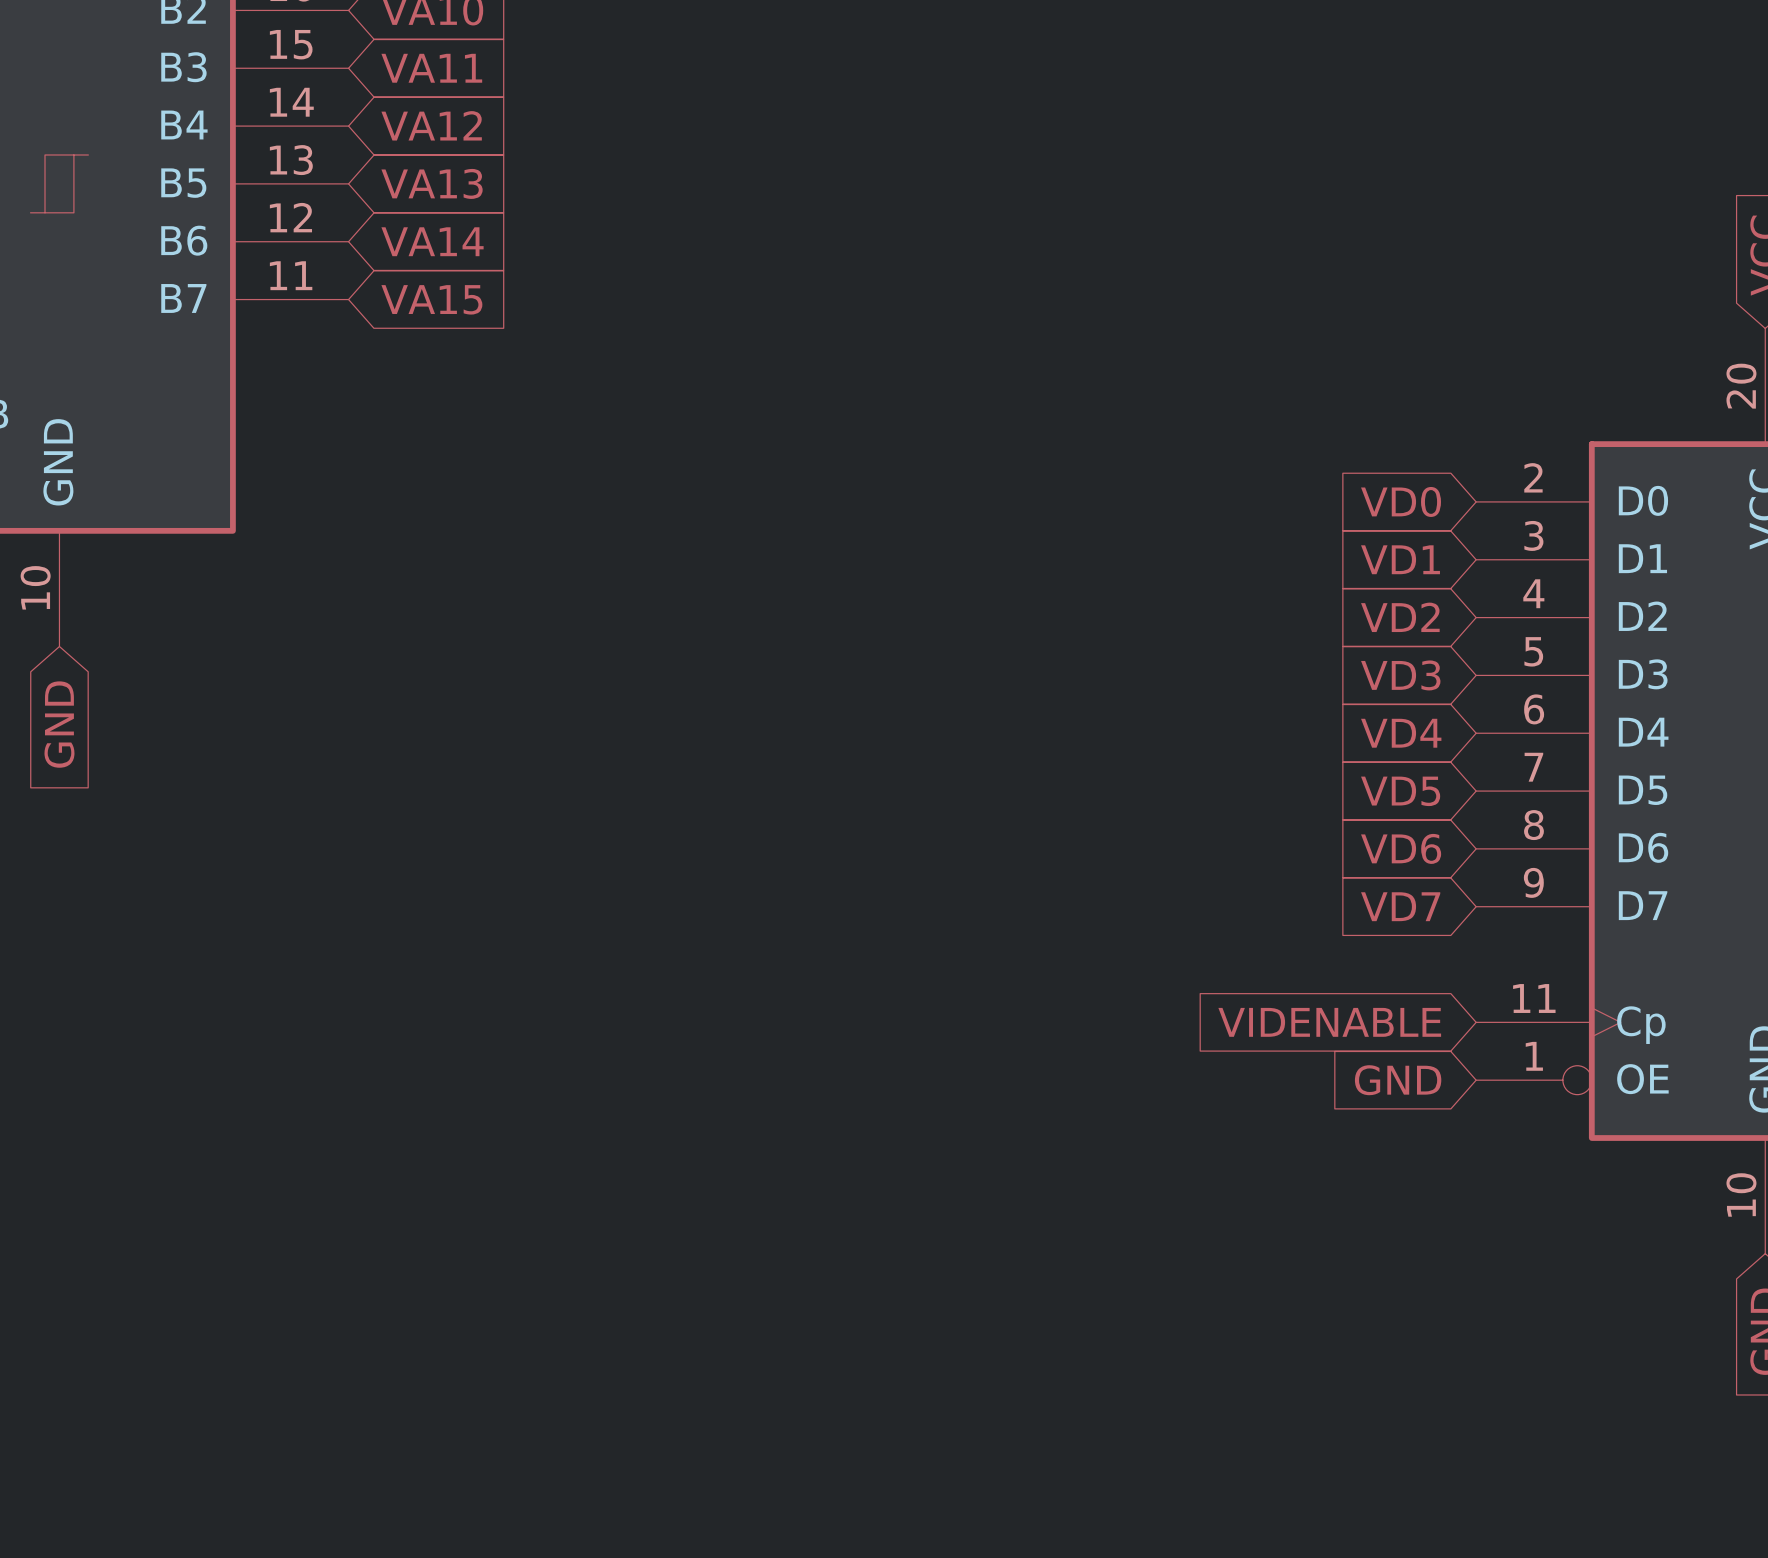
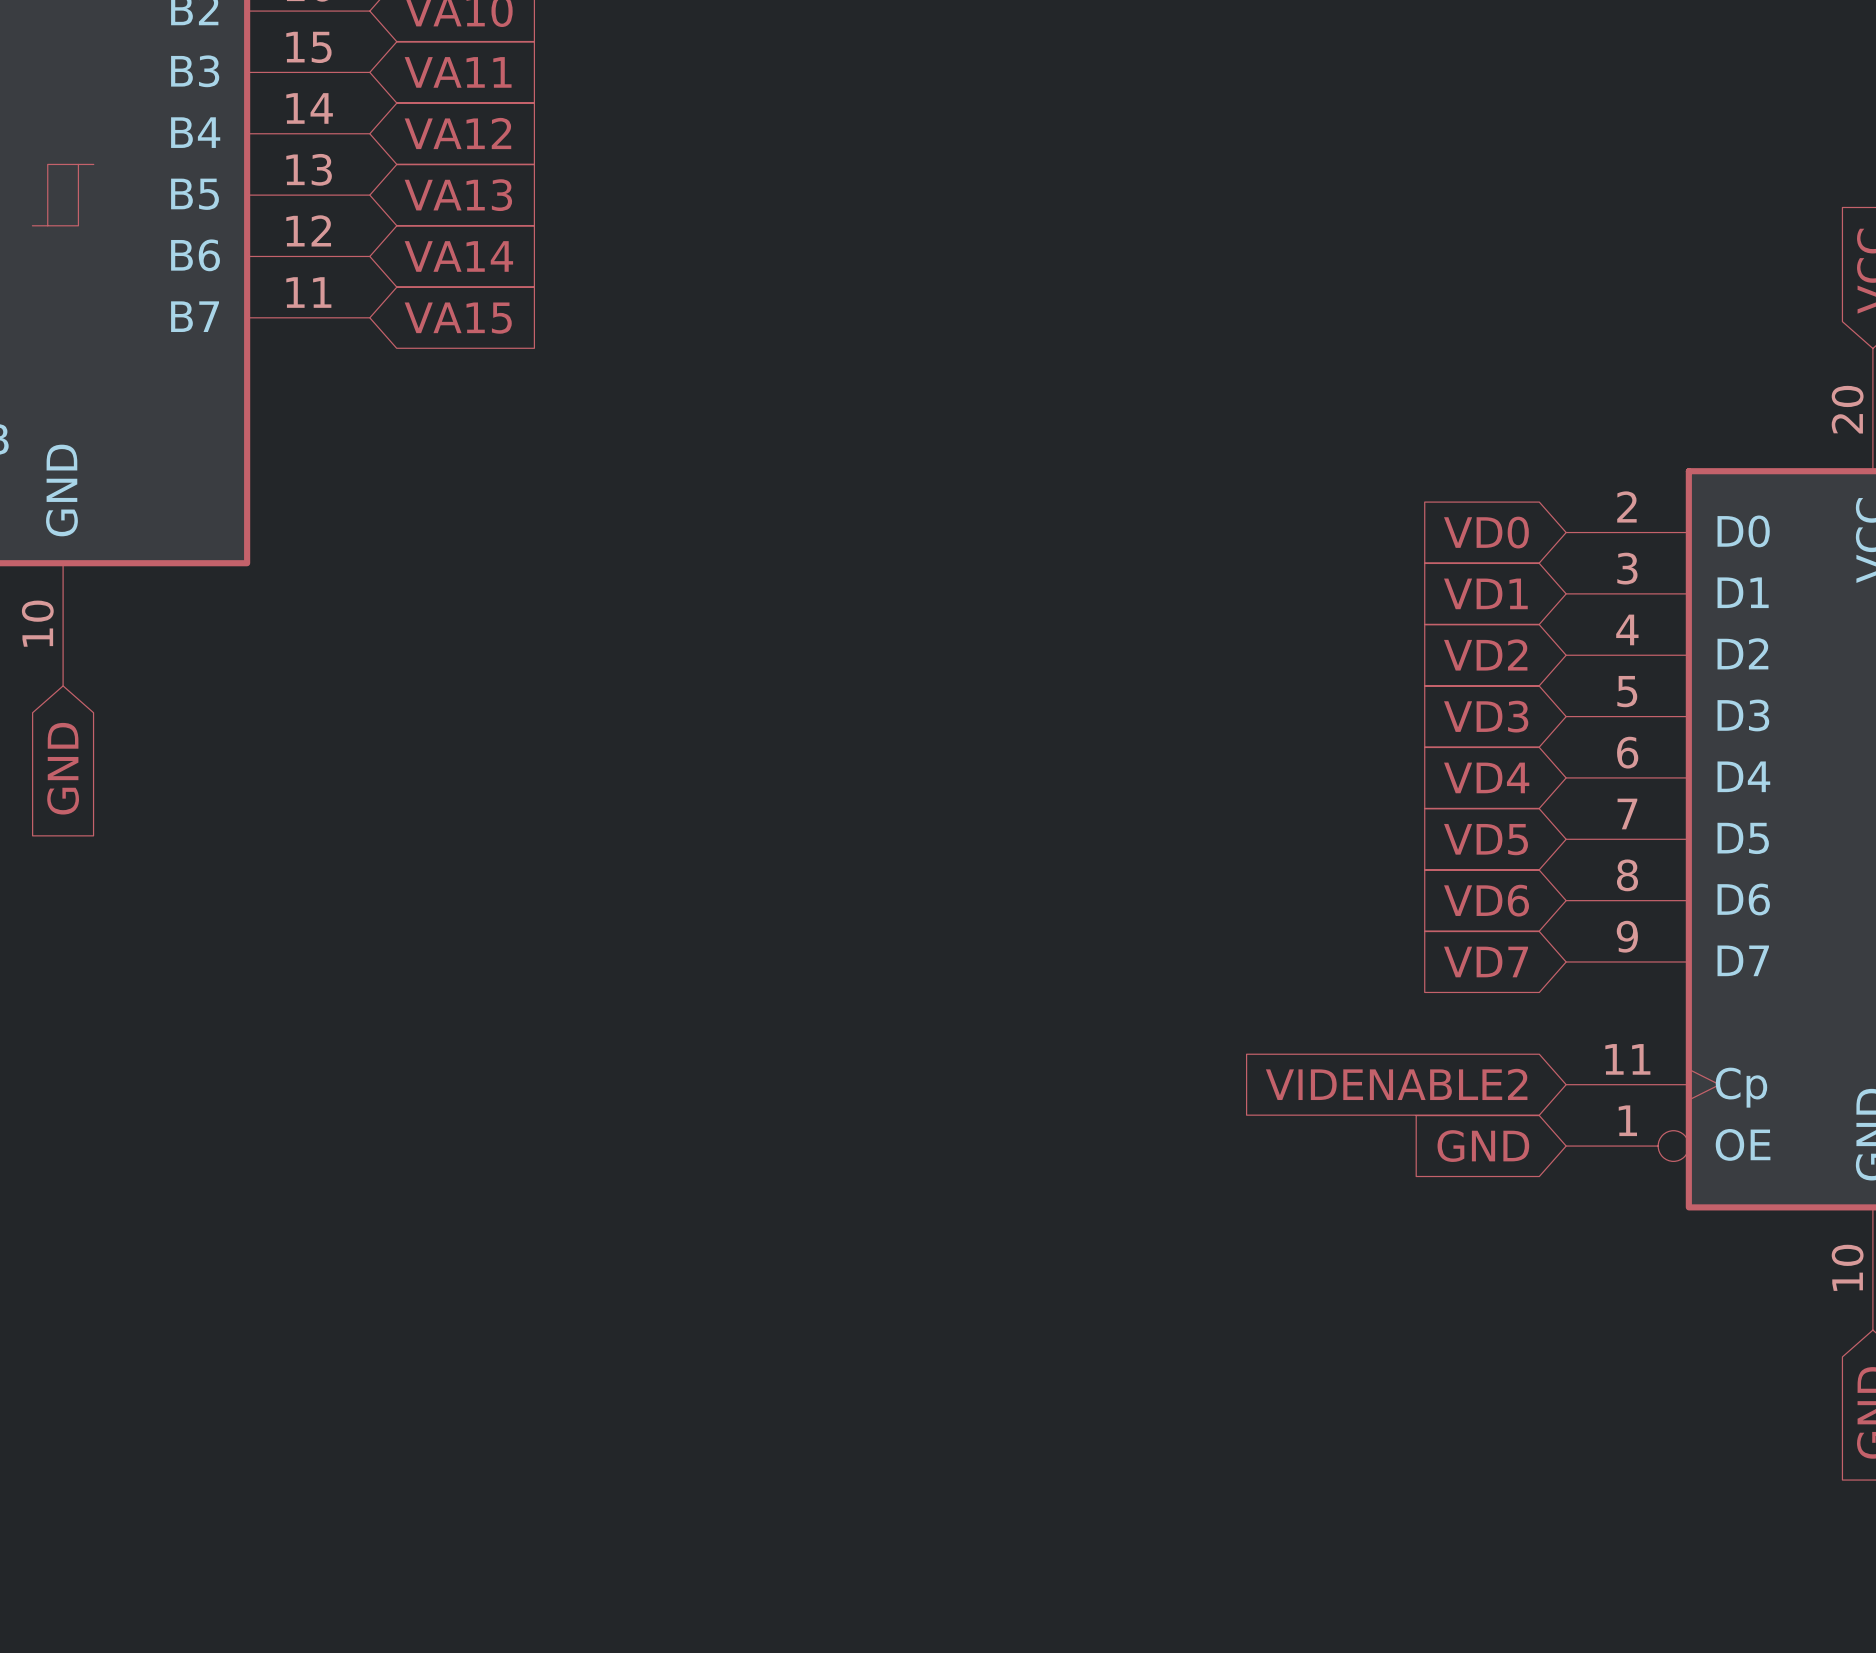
global label: VIDENABLE (1329, 1022) -> VIDENABLE2 (1396, 1084)

